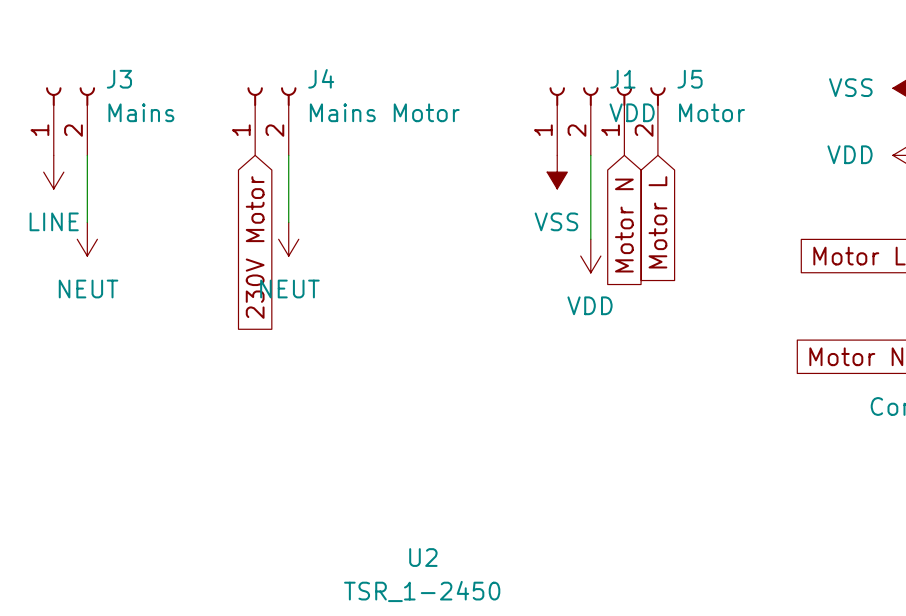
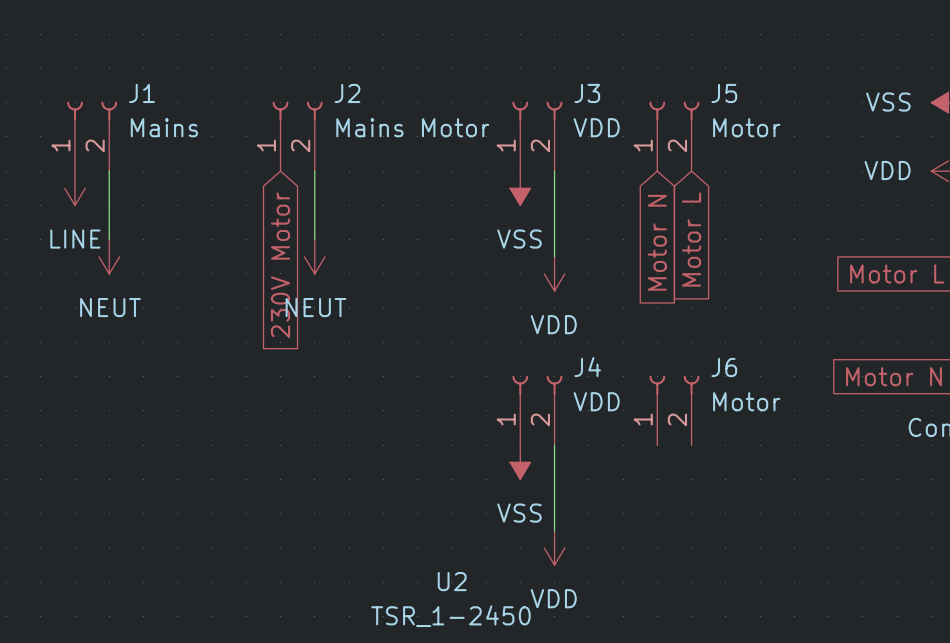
J4 name: J4 (321, 78) -> J2 (347, 93)
J3 name: J3 (119, 79) -> J1 (142, 93)
J3: none -> VDD (537, 136)
J1: VDD (574, 121) -> none
wire: (590, 155) (590, 239) -> (554, 171) (554, 256)
power symbol position: VSS (557, 172) -> VSS (520, 188)
power symbol position: VDD (590, 256) -> VDD (554, 273)
J4: none -> VDD (537, 410)
J6: none -> Motor (674, 410)
wire: none -> (554, 445) (554, 530)
power symbol: none -> VSS (520, 462)
power symbol: none -> VDD (554, 547)

